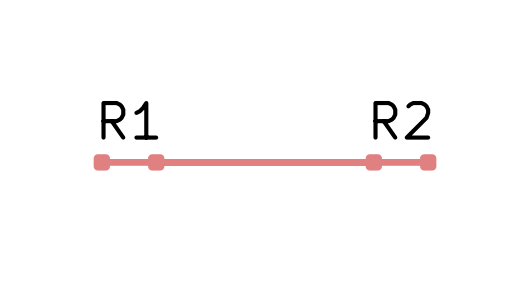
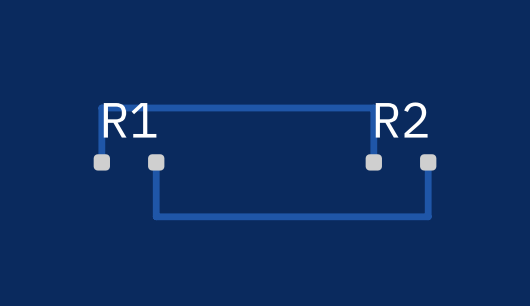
track: (101, 162) (428, 162) -> (101, 162) (101, 108) (373, 108) (373, 162)
track: none -> (156, 162) (156, 216) (428, 216) (428, 162)

